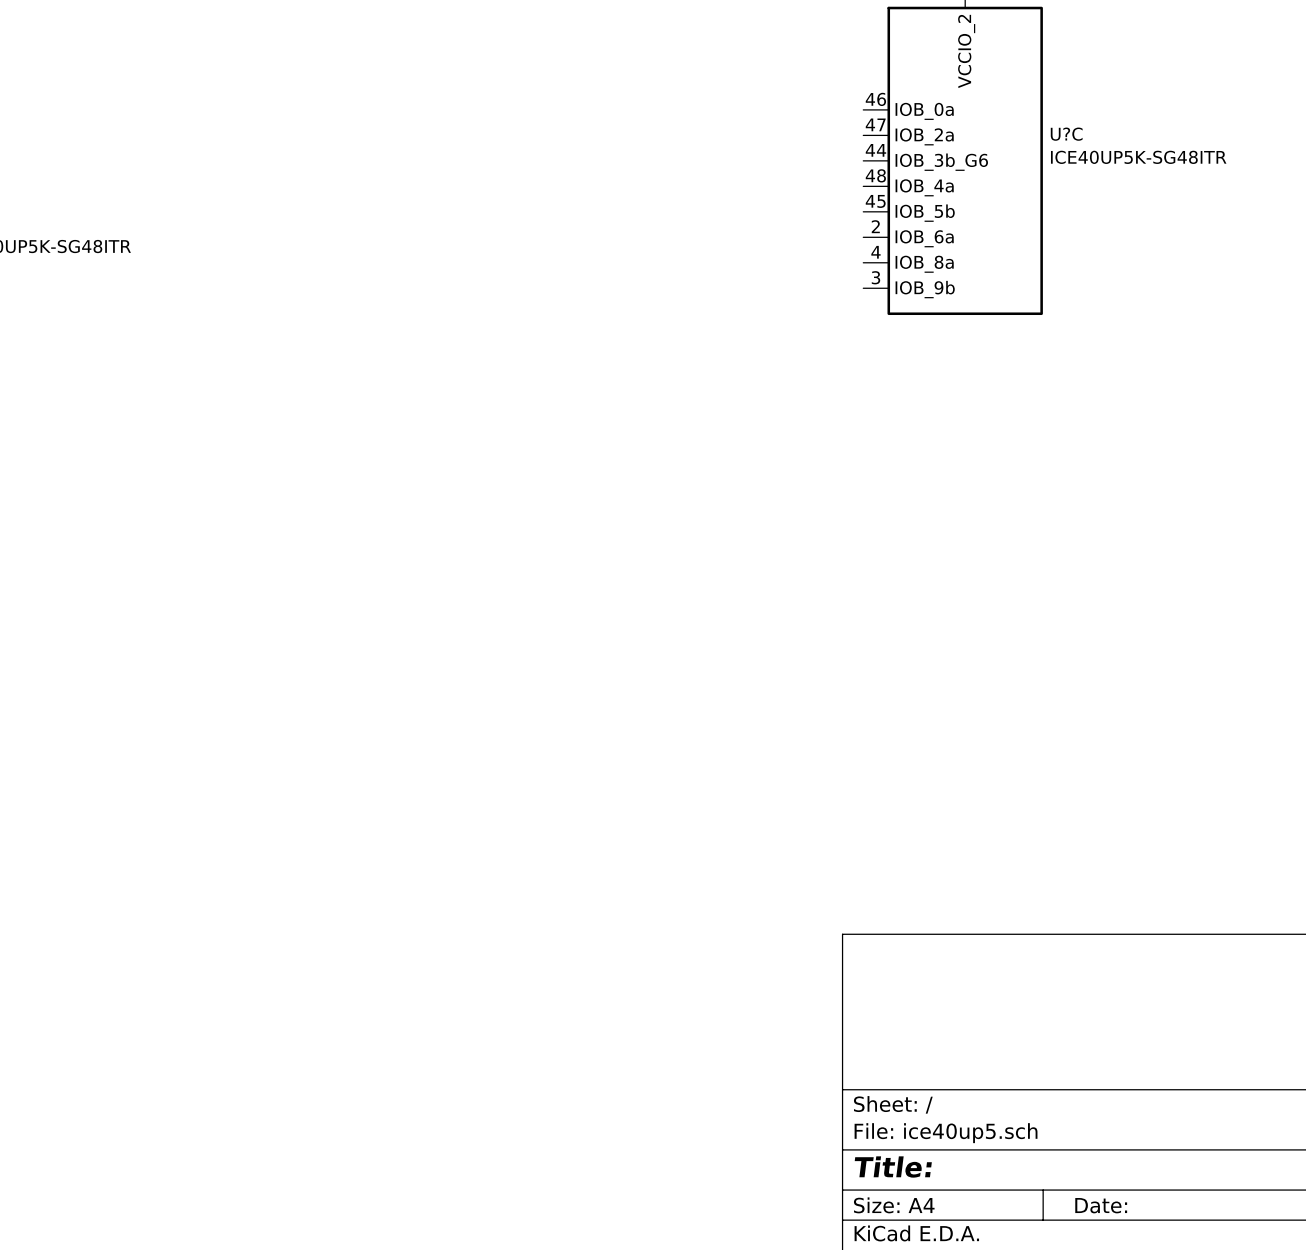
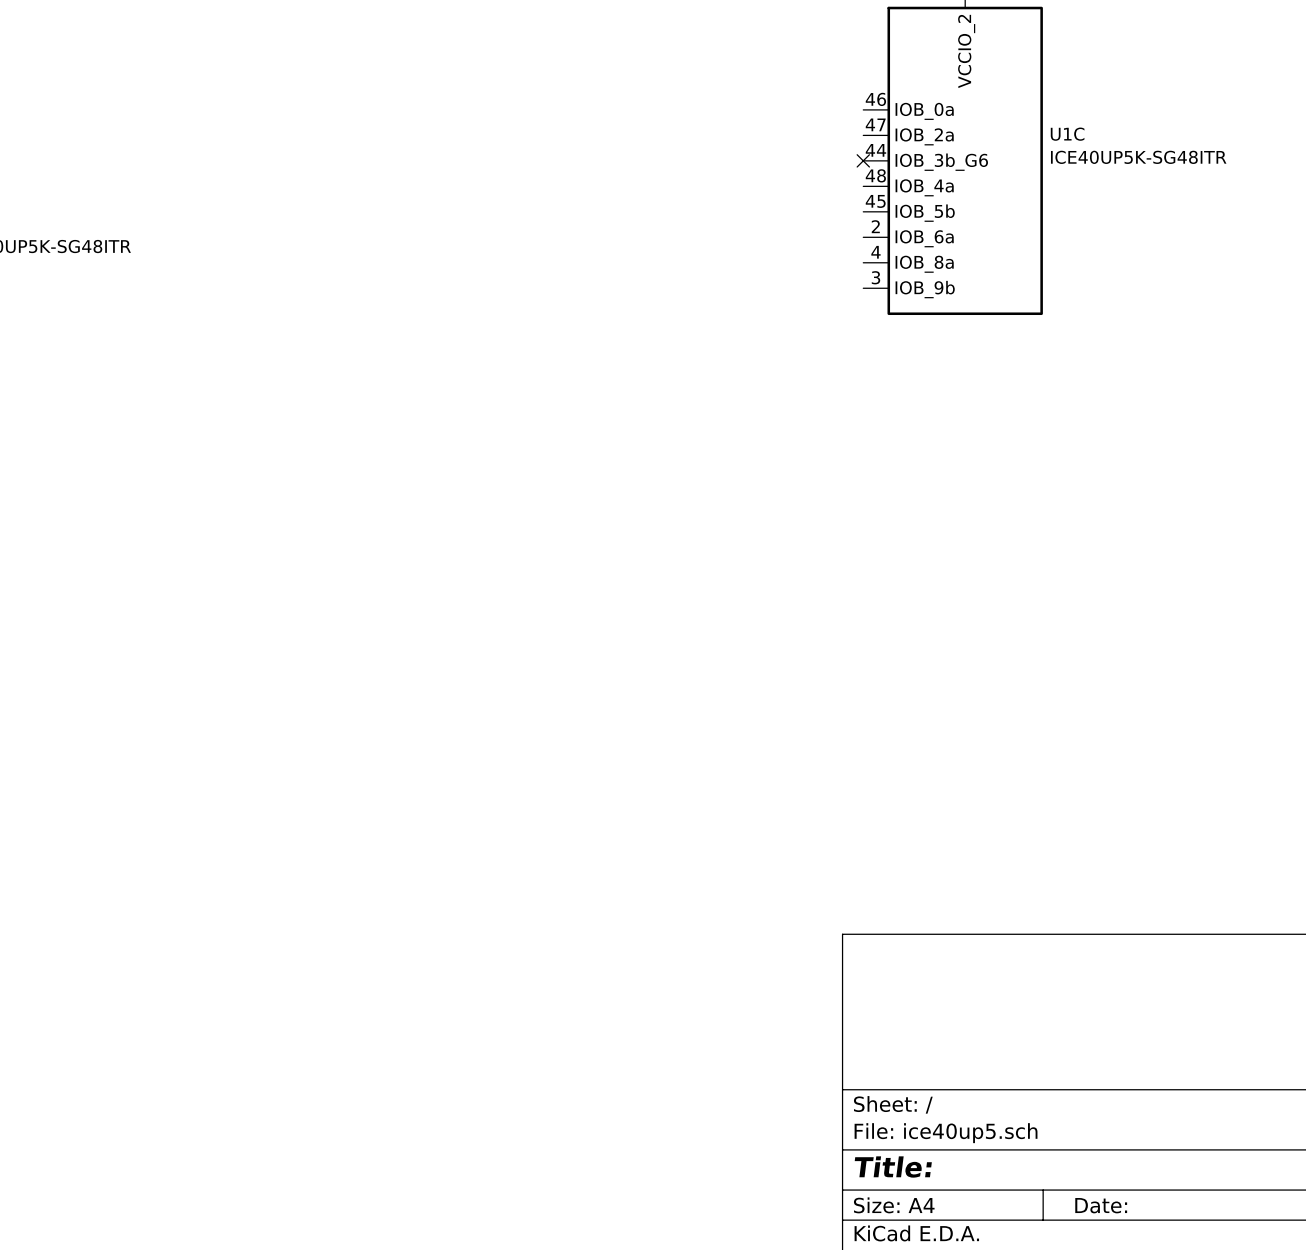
U?C name: U?C (1066, 134) -> U1C (1067, 134)
no-connect mark: none -> (863, 160)

